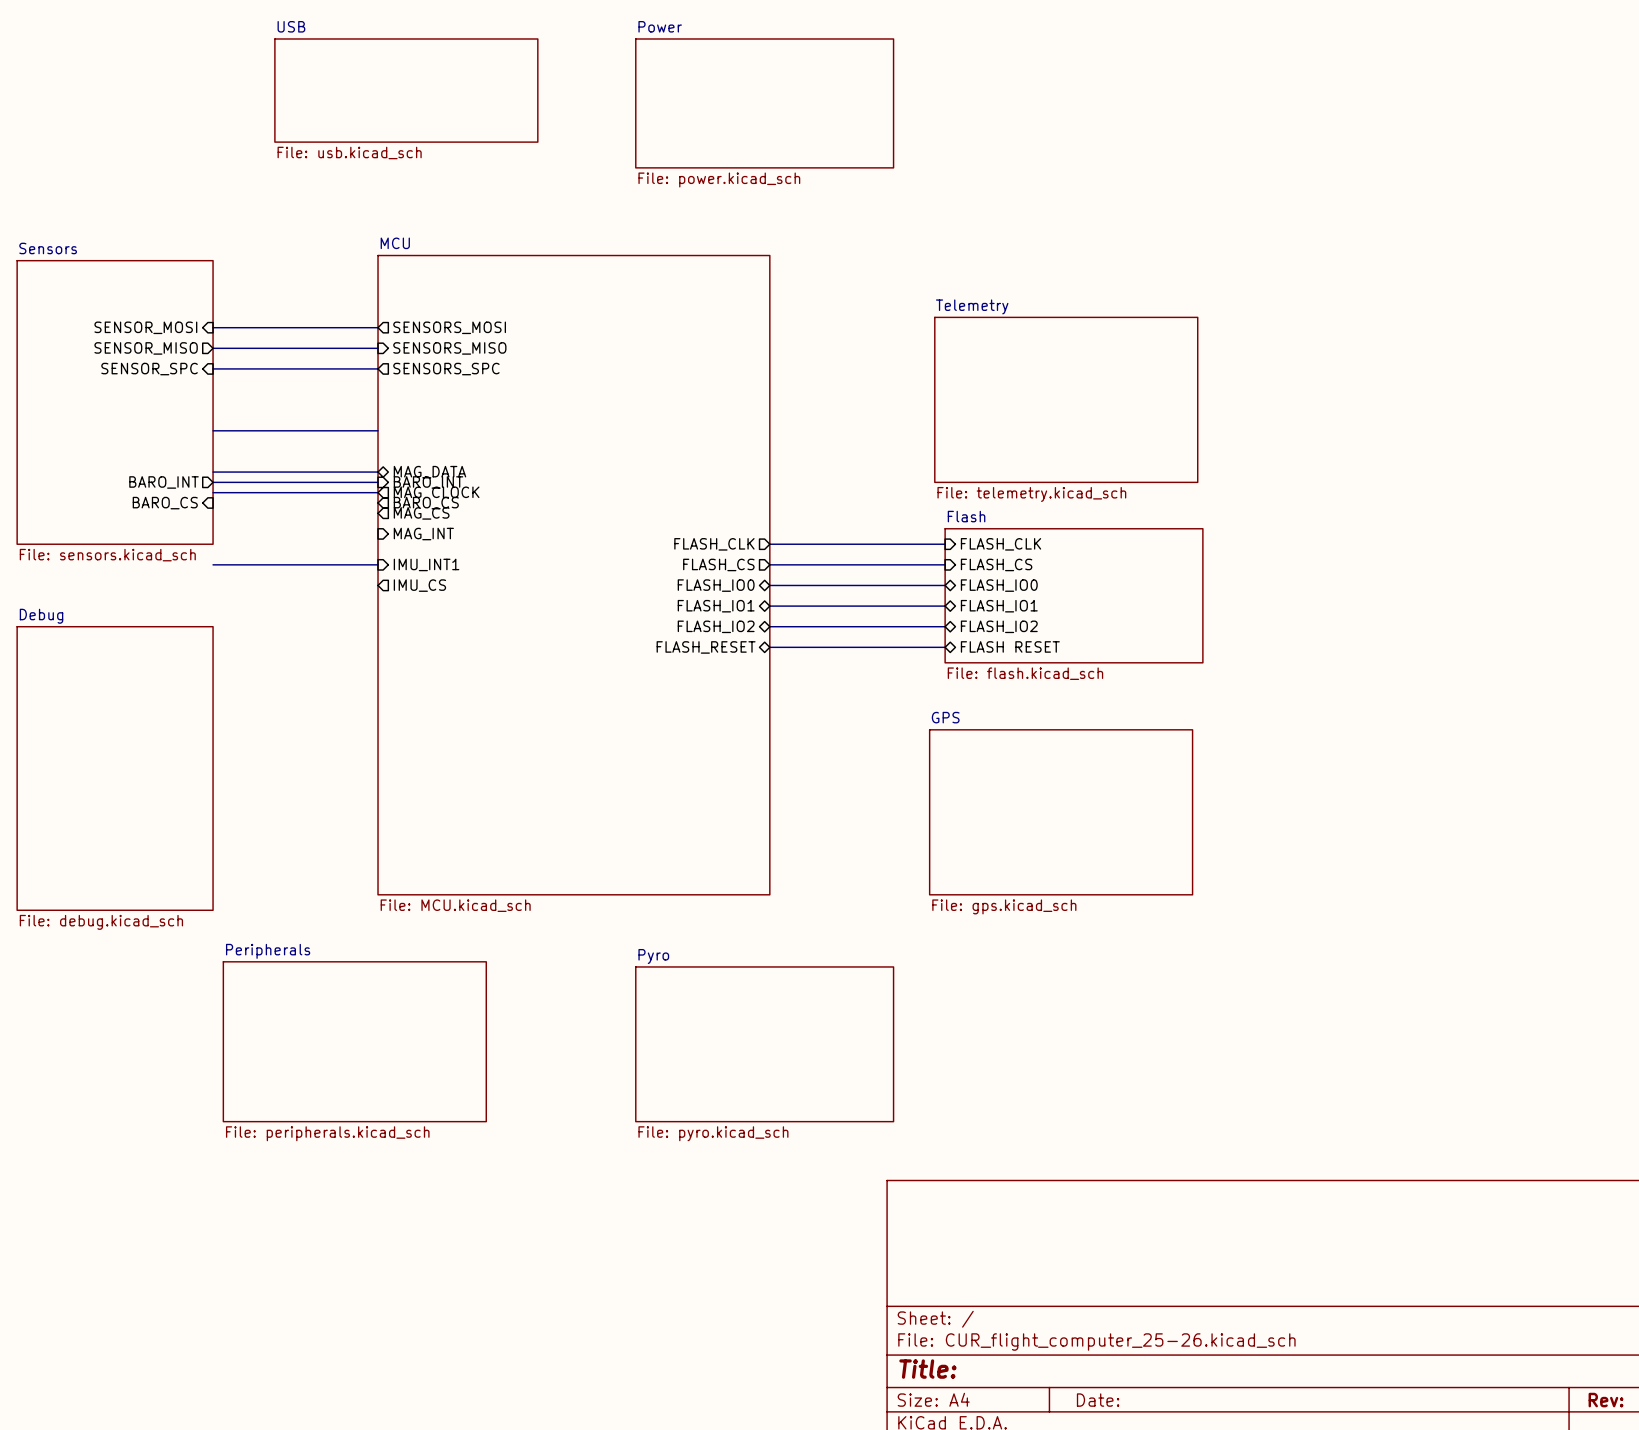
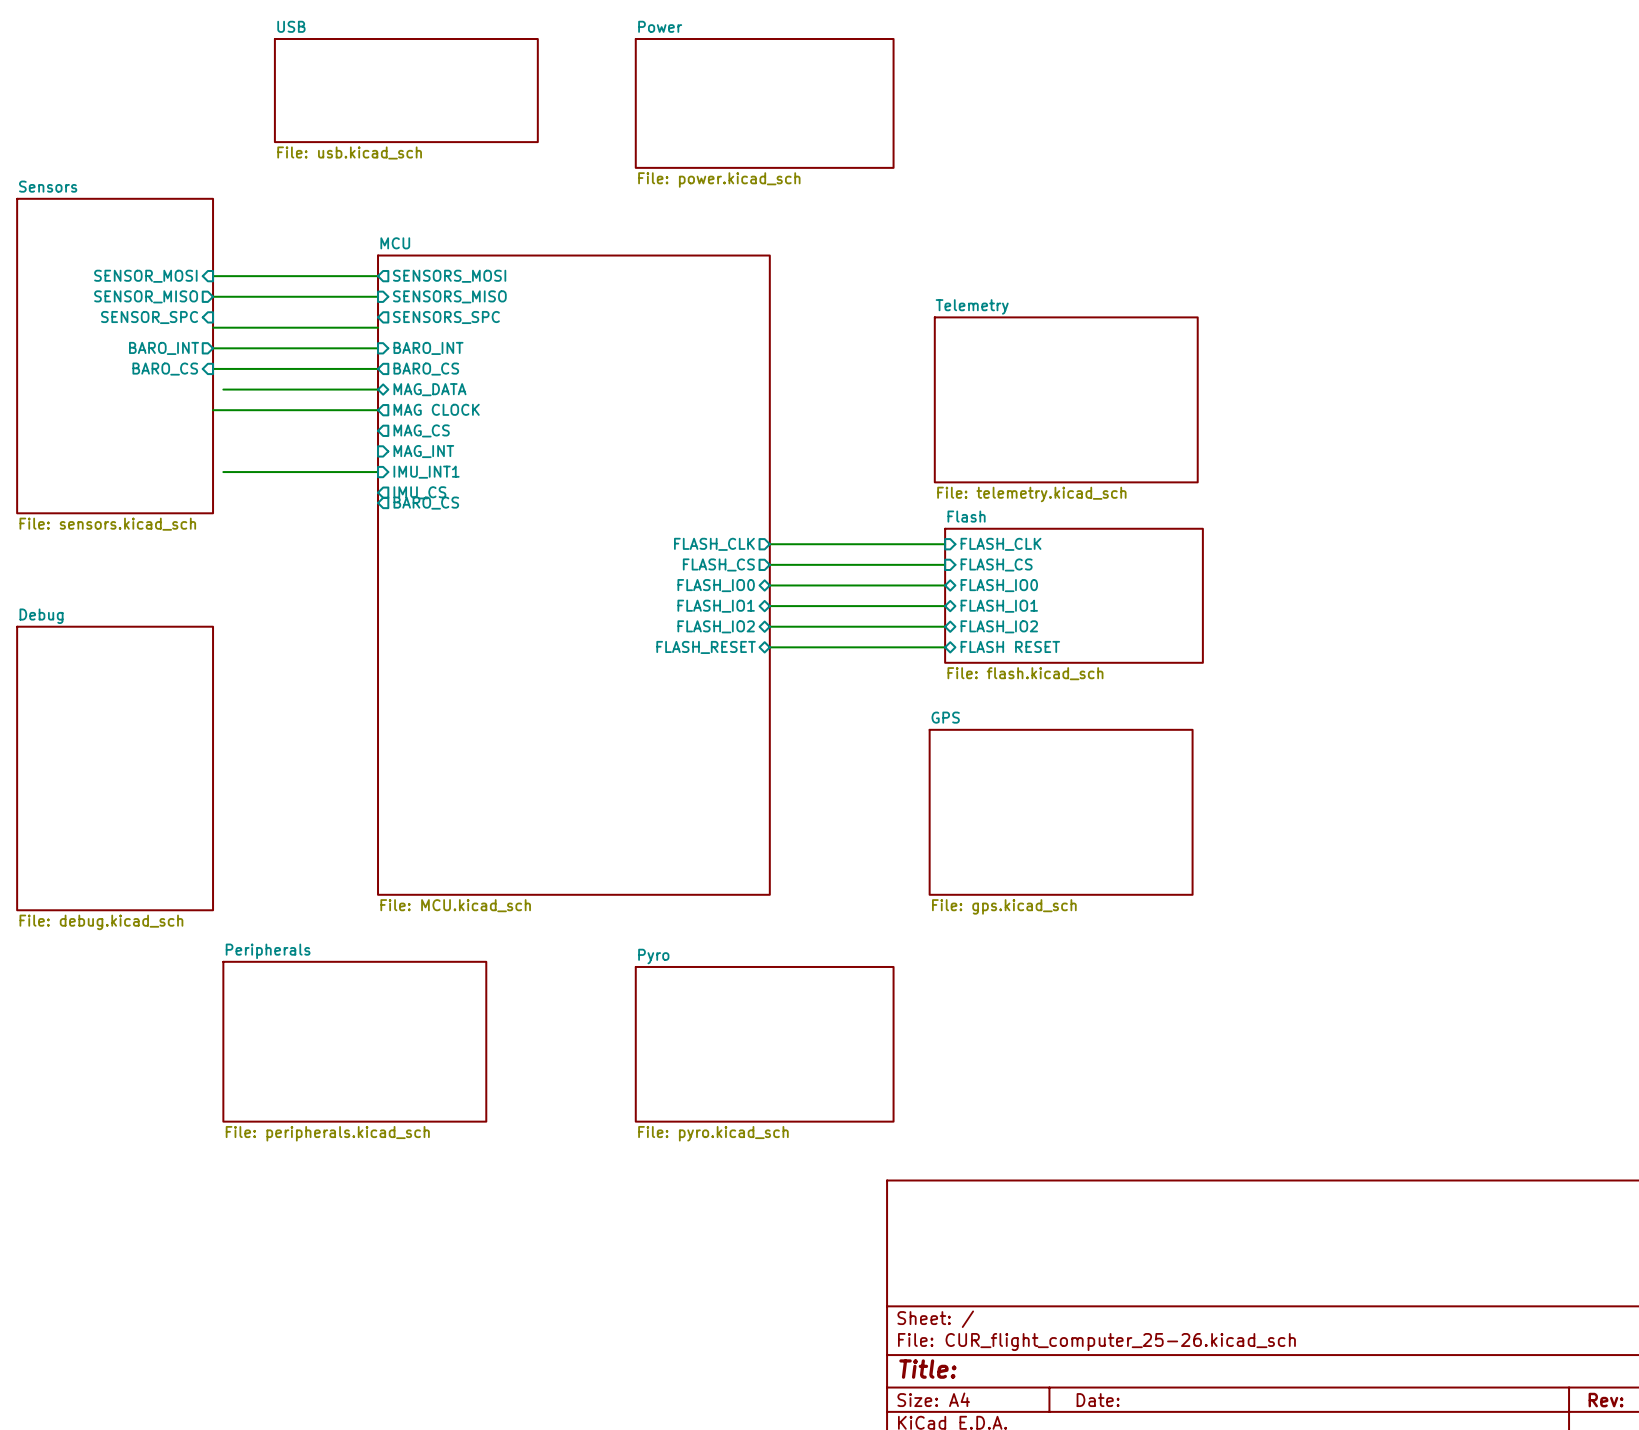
sheet pin: none -> SENSOR_MISO (146, 296)
sheet pin: none -> SENSORS_MISO (449, 296)
sheet pin: none -> SENSOR_SPC (149, 317)
sheet pin: none -> SENSORS_SPC (446, 317)
sheet pin position: SENSOR_MOSI (145, 327) -> SENSOR_MOSI (145, 276)
sheet pin position: SENSORS_MOSI (449, 327) -> SENSORS_MOSI (449, 276)
sheet pin: SENSOR_MISO (146, 348) -> BARO_INT (164, 348)
sheet pin: SENSORS_MISO (449, 348) -> BARO_INT (428, 348)
sheet Sensors: none -> File: sensors.kicad_sch (115, 356)
sheet pin: SENSOR_SPC (149, 369) -> BARO_CS (165, 369)
sheet pin: SENSORS_SPC (446, 369) -> BARO_CS (426, 369)
wire: none -> (223, 389) (378, 389)
sheet pin: none -> MAG_DATA (429, 389)
sheet Sensors: File: sensors.kicad_sch (115, 402) -> none
sheet pin: none -> MAG CLOCK (436, 409)
wire: (213, 430) (378, 430) -> (213, 276) (378, 276)
wire: (213, 472) (223, 472) -> none
sheet pin shape: bidirectional (429, 472) -> input (426, 472)
sheet pin: MAG_DATA (429, 472) -> IMU_INT1 (426, 472)
sheet pin: BARO_INT (164, 482) -> none
wire: (213, 482) (378, 482) -> (213, 296) (378, 296)
sheet pin: BARO_INT (428, 482) -> none
wire: (213, 492) (378, 492) -> none
sheet pin: MAG CLOCK (436, 492) -> IMU_CS (419, 492)
sheet pin: BARO_CS (165, 503) -> none
sheet pin position: MAG_CS (421, 513) -> MAG_CS (421, 430)
sheet pin position: MAG_INT (423, 534) -> MAG_INT (423, 451)
wire: (213, 564) (378, 564) -> (213, 410) (378, 410)
sheet pin: IMU_INT1 (426, 564) -> none
sheet pin: IMU_CS (419, 585) -> none

